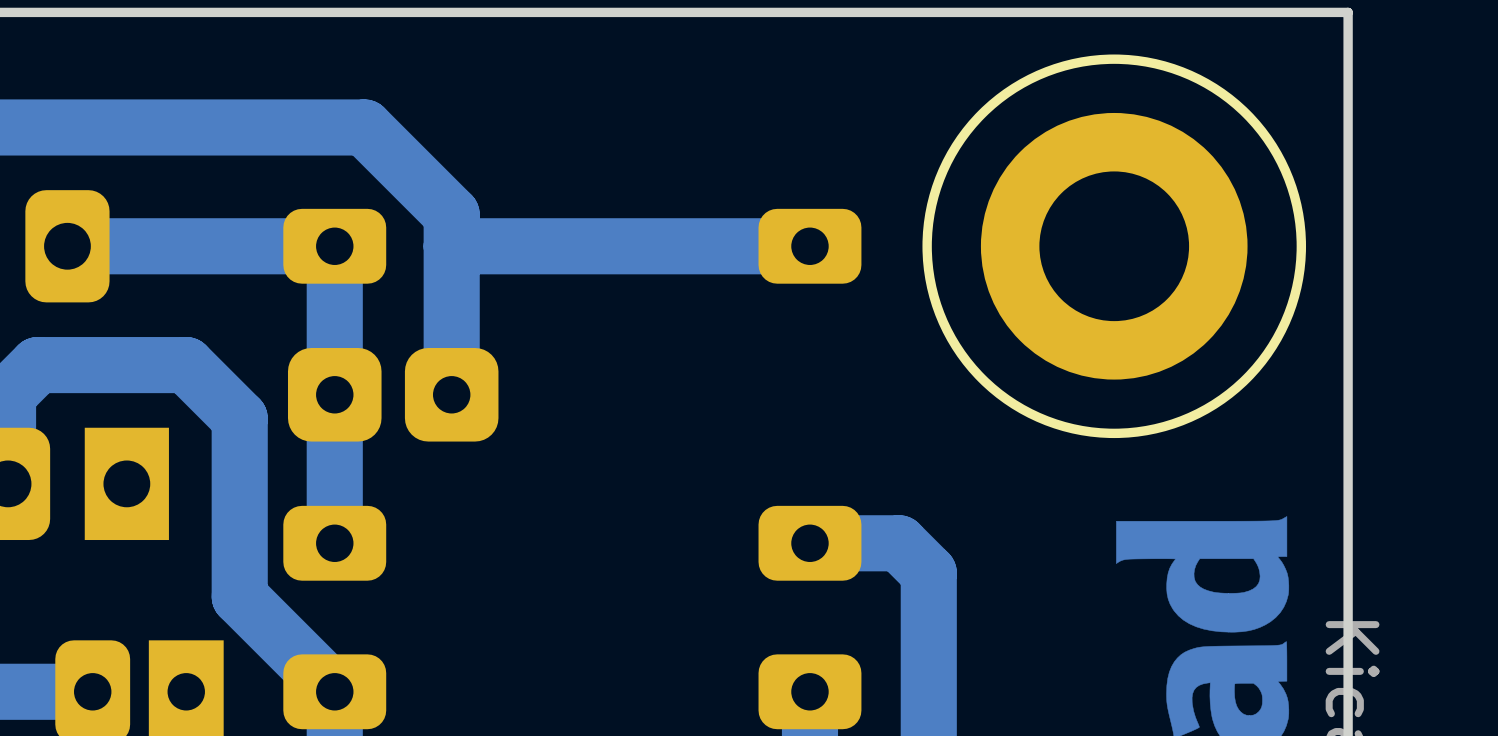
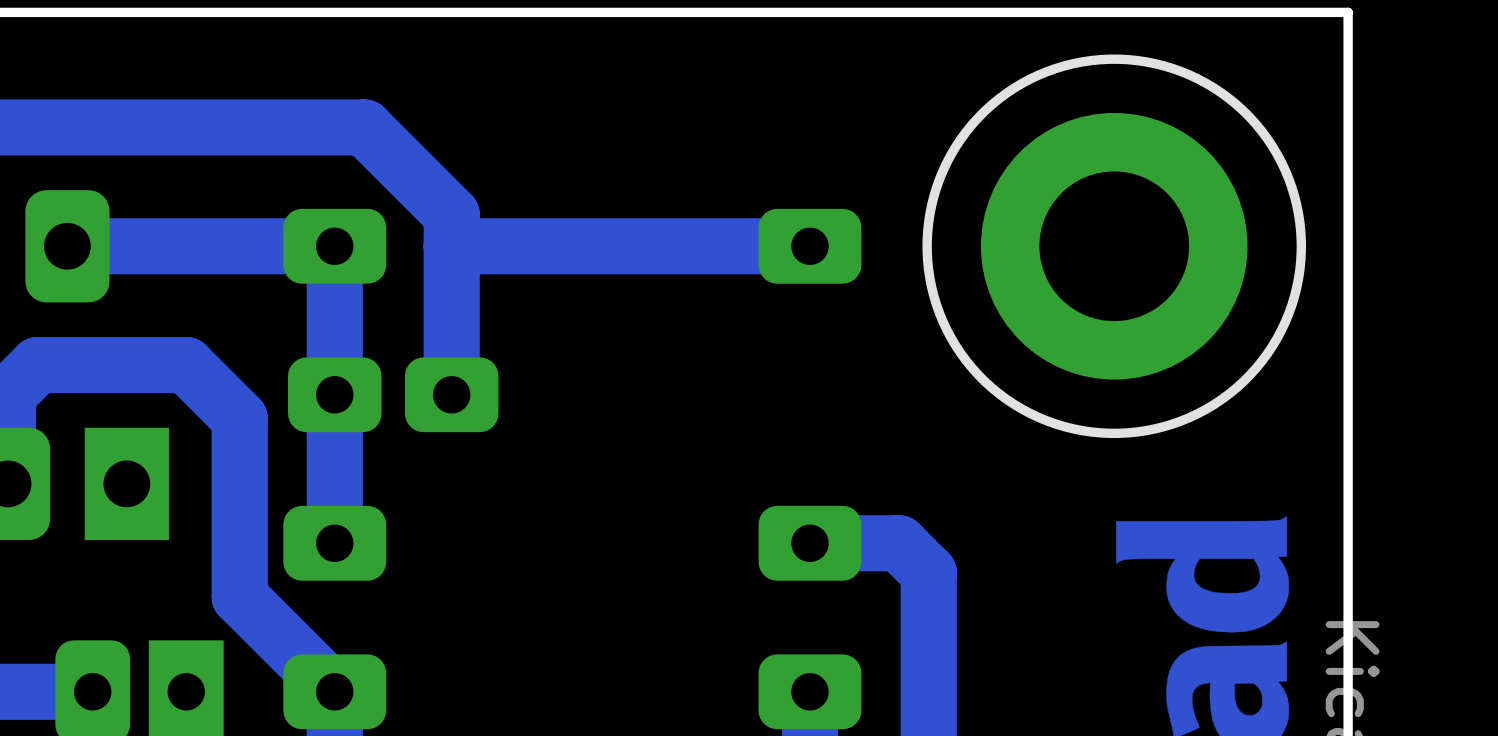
part footprint: [287, 348, 499, 442] -> [287, 357, 499, 433]

